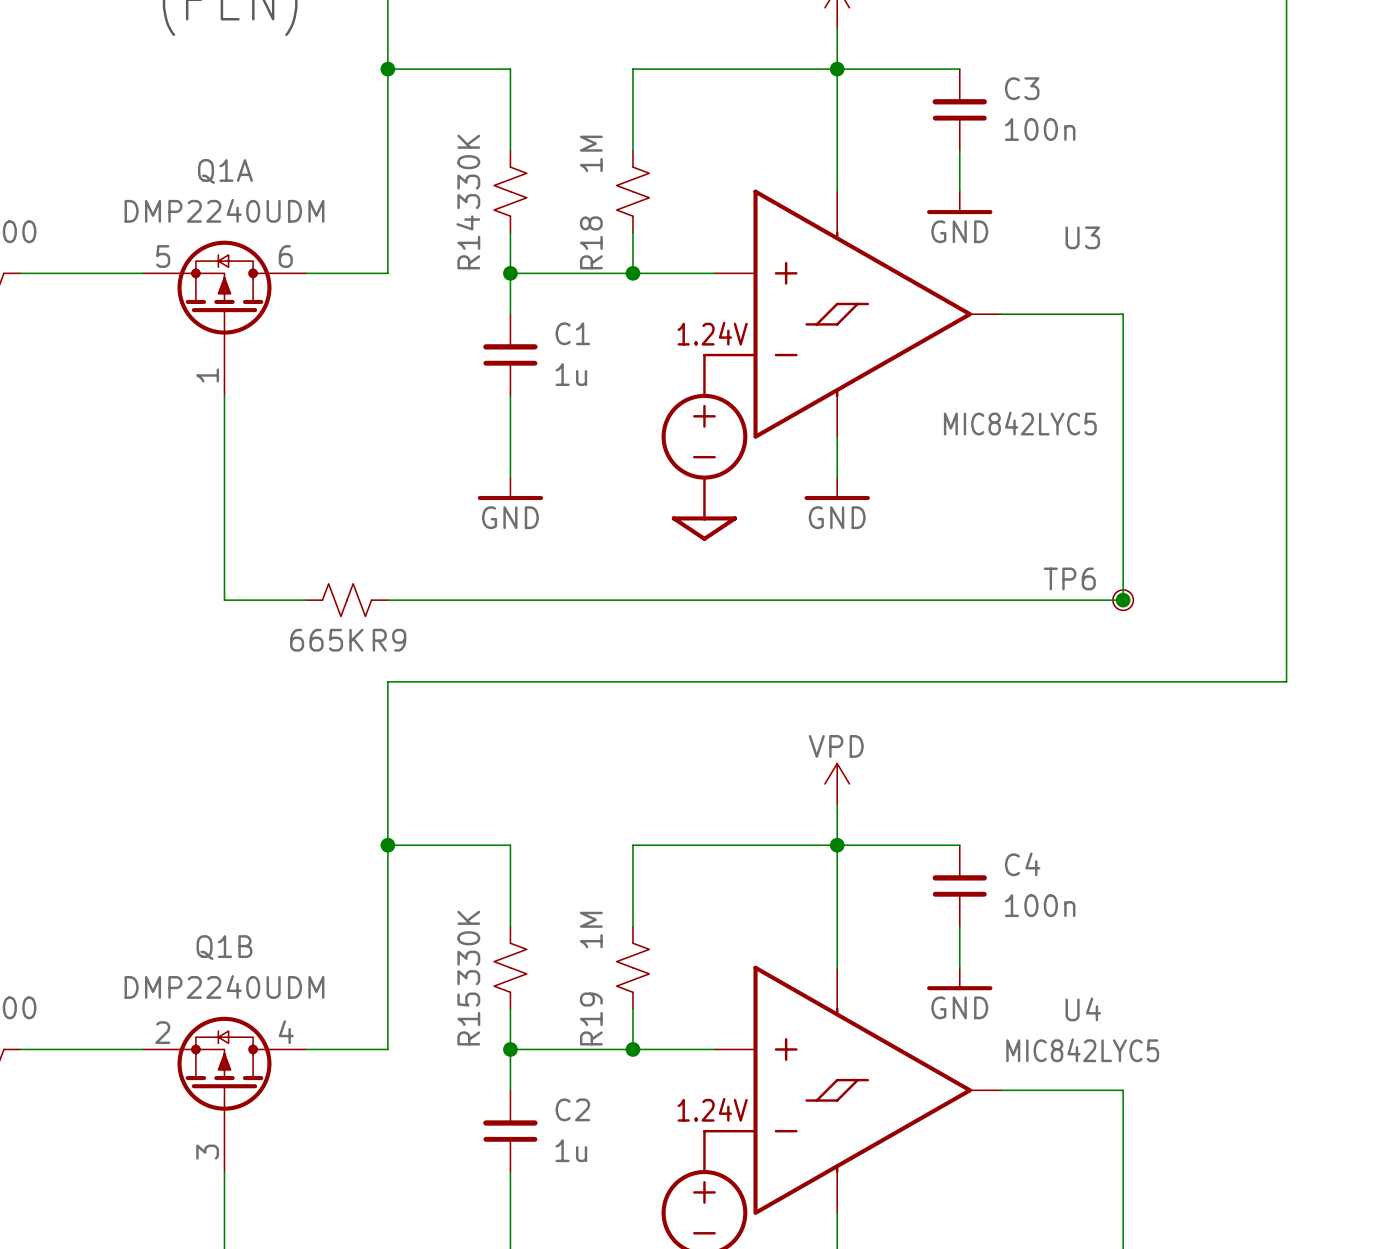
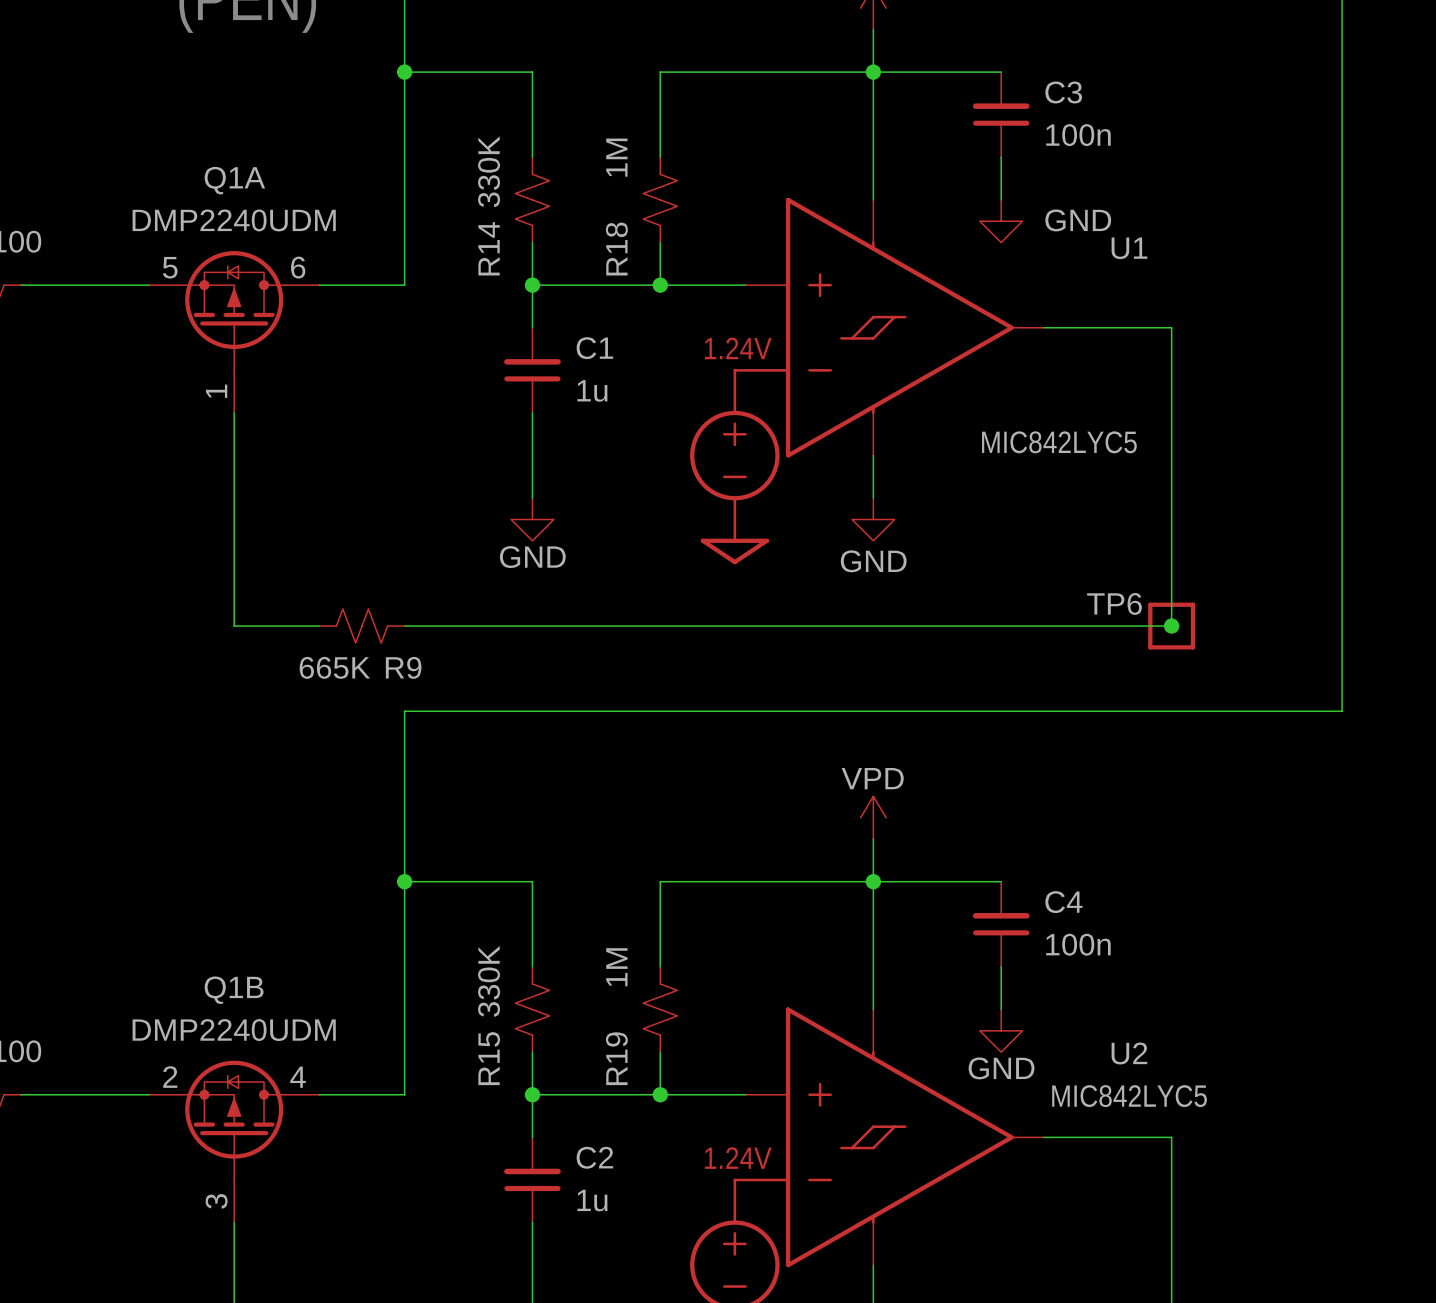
power symbol shape: [927, 191, 993, 215] -> [979, 199, 1023, 243]
power symbol text position: GND (959, 231) -> GND (1078, 220)
U3 name: U3 (1082, 237) -> U1 (1129, 248)
power symbol shape: [477, 477, 544, 501] -> [511, 498, 554, 541]
power symbol shape: [804, 477, 870, 501] -> [852, 498, 895, 541]
TP6 symbol: [1112, 589, 1134, 611] -> [1148, 602, 1196, 650]
power symbol shape: [927, 967, 993, 991] -> [979, 1009, 1023, 1053]
U4 name: U4 (1083, 1009) -> U2 (1129, 1053)

